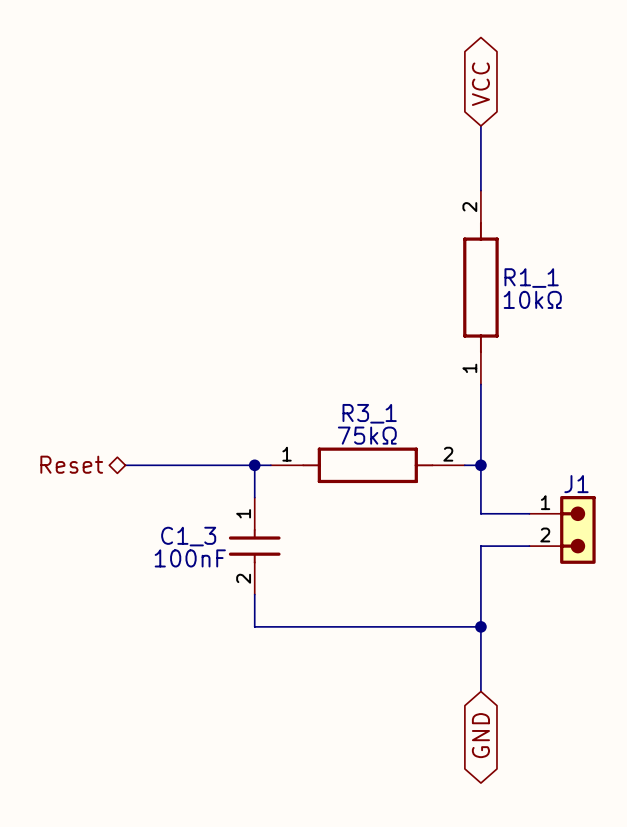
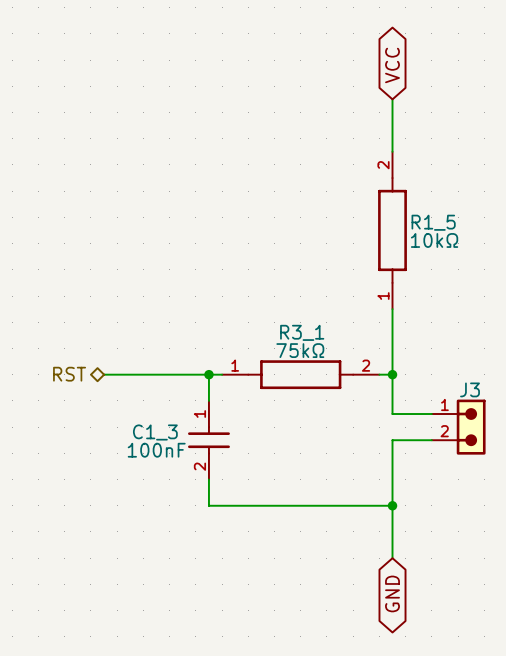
R1_1 name: R1_1 (531, 278) -> R1_5 (433, 222)
hierarchical label: Reset (71, 464) -> RST (69, 374)
J1 name: J1 (576, 484) -> J3 (470, 389)

